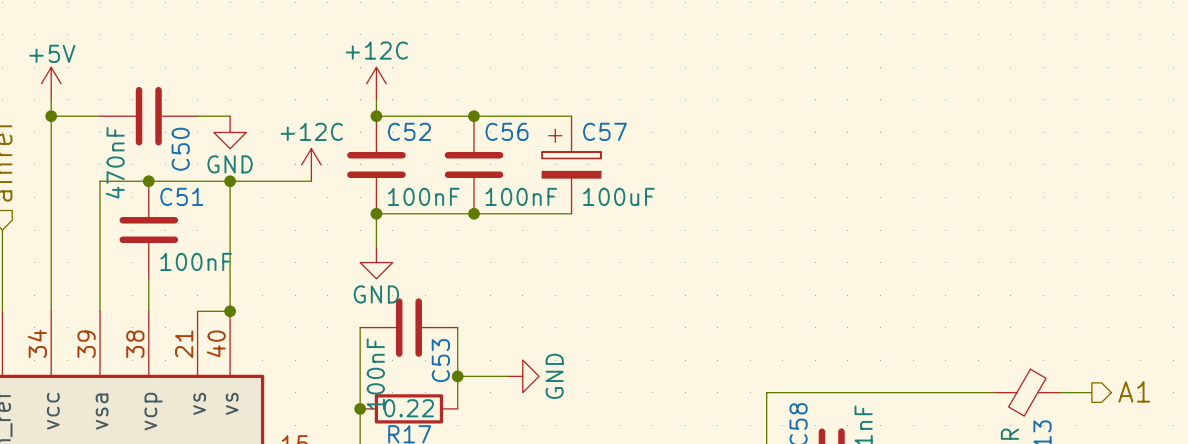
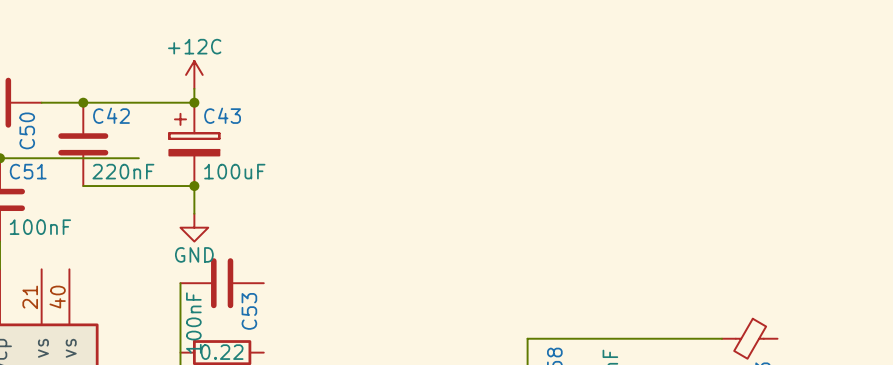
wire: (376, 116) (571, 116) -> (194, 102) (69, 102)
junction: (473, 116) -> none
power symbol: GND (230, 132) -> none
C42: none -> 220nF (83, 144)
power symbol: +12C (311, 164) -> none
C52: 100nF (376, 164) -> none
C43: none -> 100uF (194, 144)
C56: 100nF (473, 164) -> none
C57: 100uF (571, 164) -> none
wire: (230, 181) (230, 311) (197, 311) -> none
junction position: (230, 181) -> (83, 102)
wire: (376, 213) (571, 213) -> (194, 186) (83, 186)
junction: (473, 213) -> none
junction: (230, 311) -> none
wire: (457, 327) (457, 408) -> none
wire: (457, 376) (506, 376) -> none
junction: (457, 376) -> none
power symbol: GND (522, 376) -> none
hierarchical label: A1 (1134, 391) -> none
wire: (1059, 392) (1091, 392) -> none
junction: (360, 408) -> none

